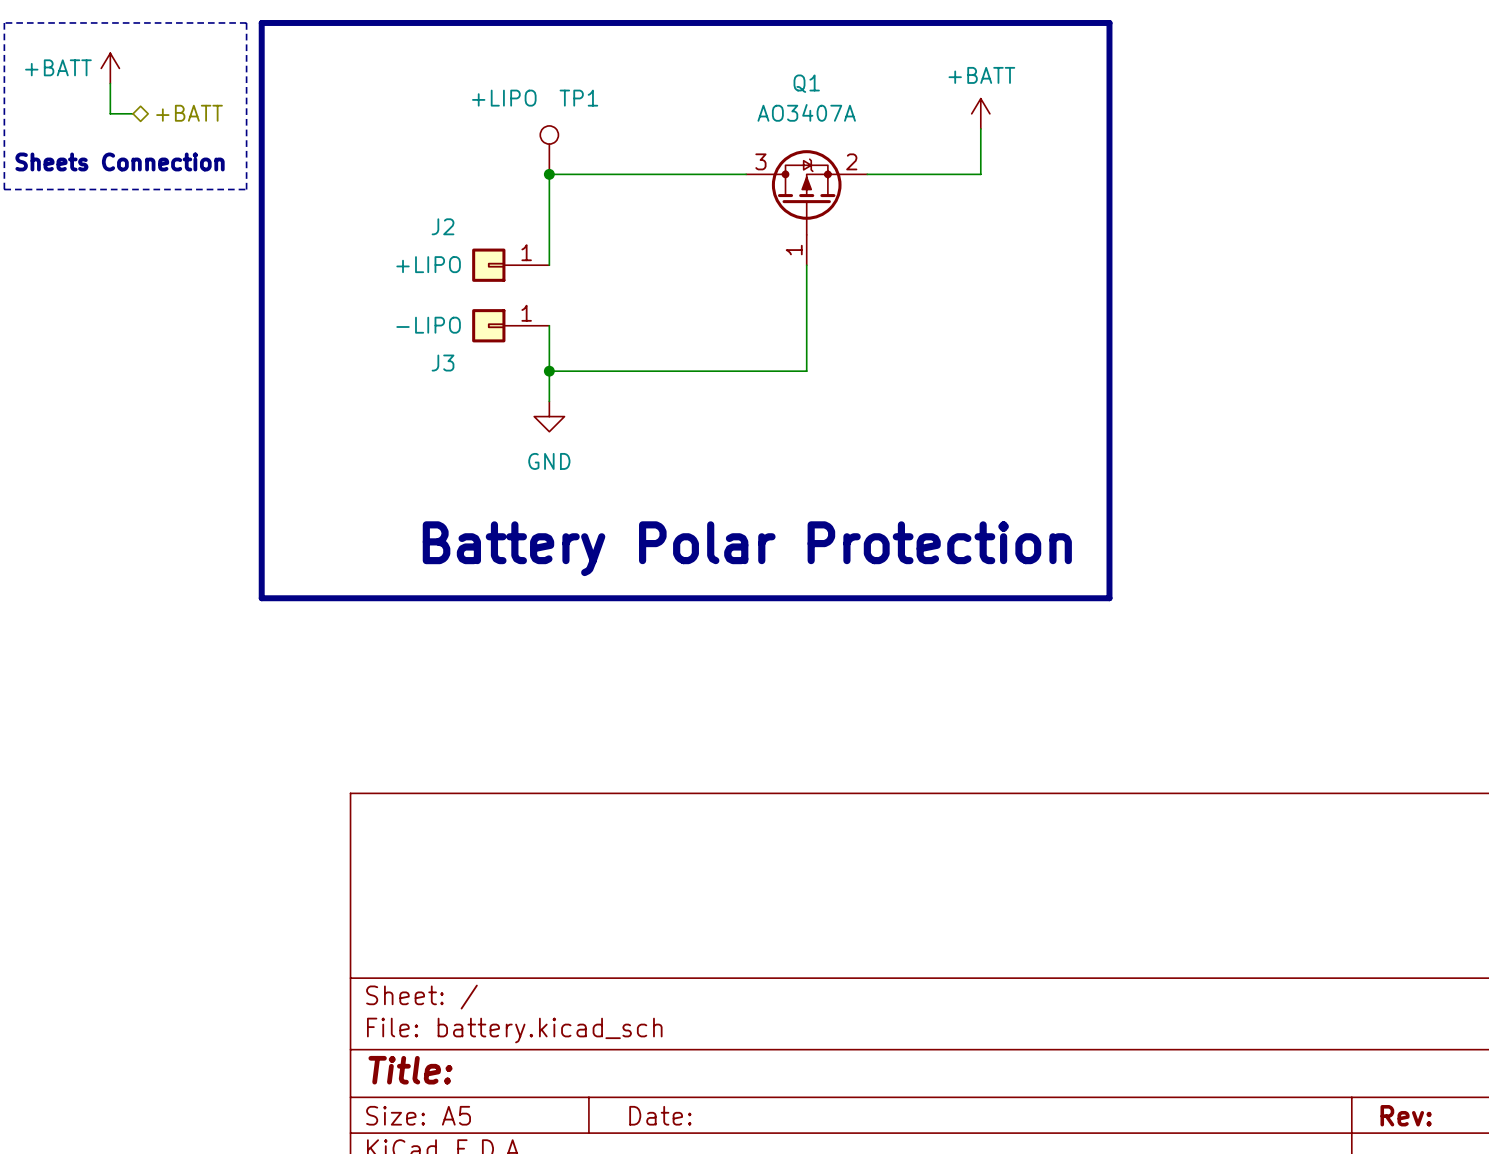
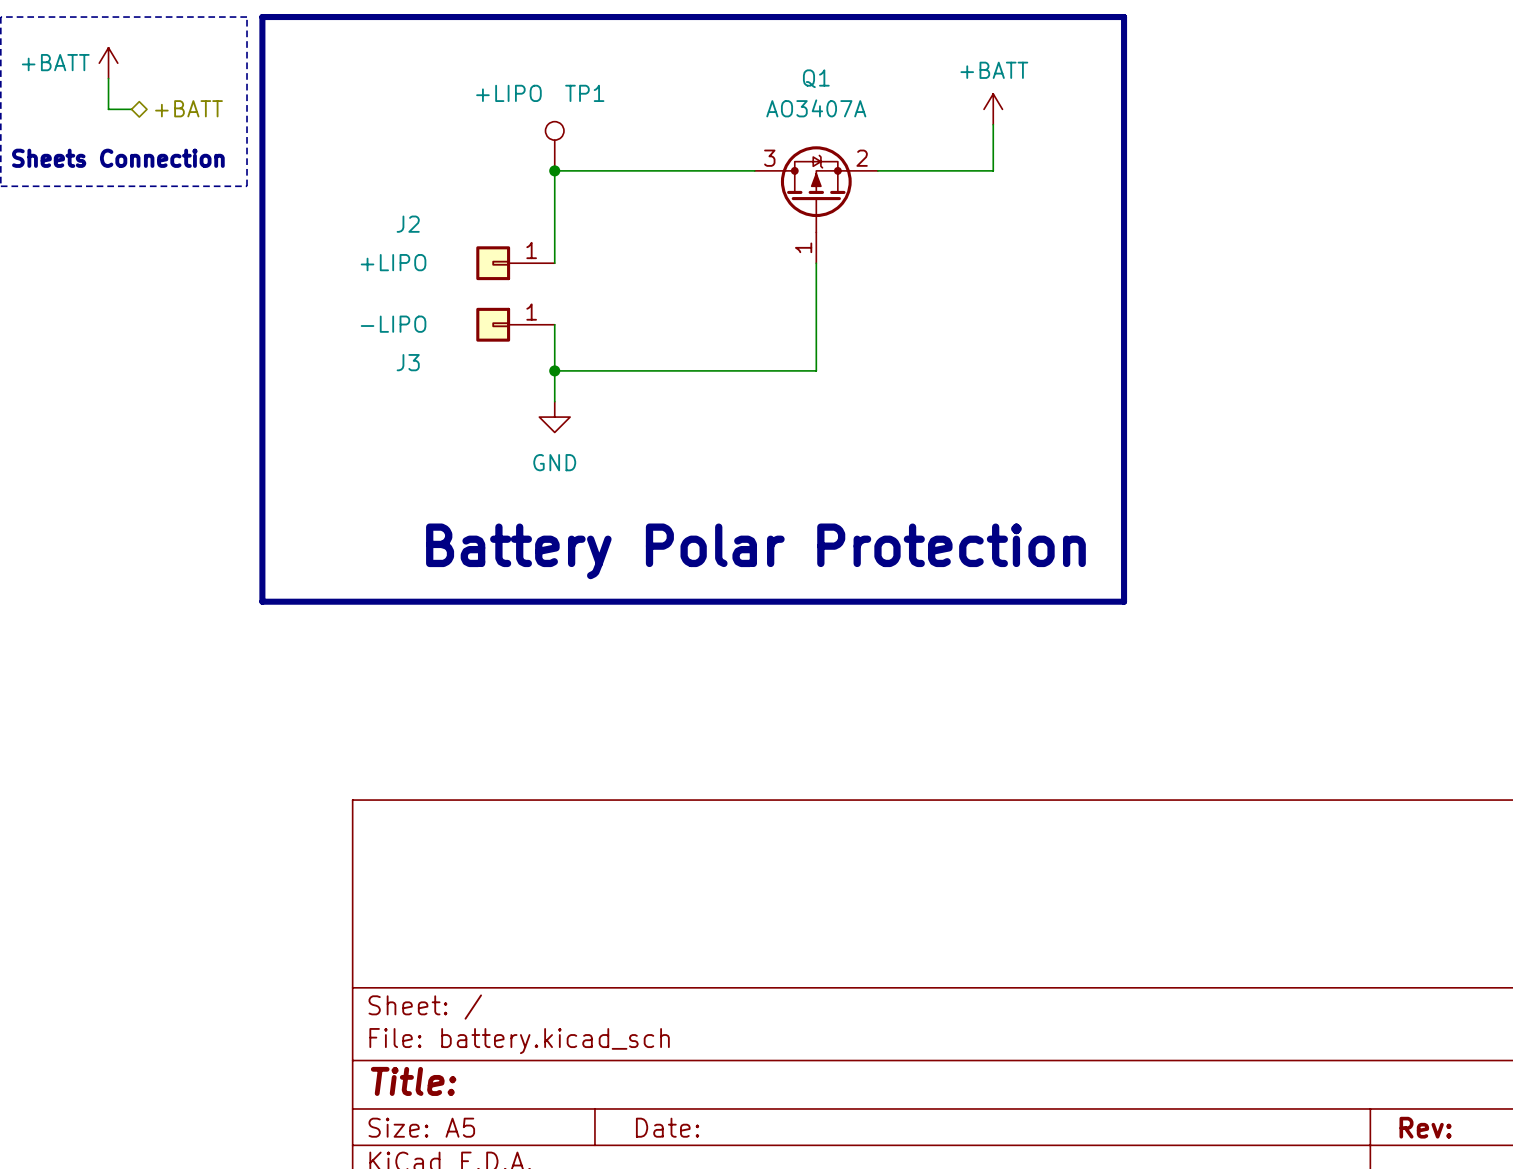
J2 name position: J2 (443, 226) -> J2 (408, 224)
J2 value position: +LIPO (428, 264) -> +LIPO (393, 262)
J3 value position: -LIPO (428, 325) -> -LIPO (393, 324)
J3 name position: J3 (443, 363) -> J3 (408, 362)

